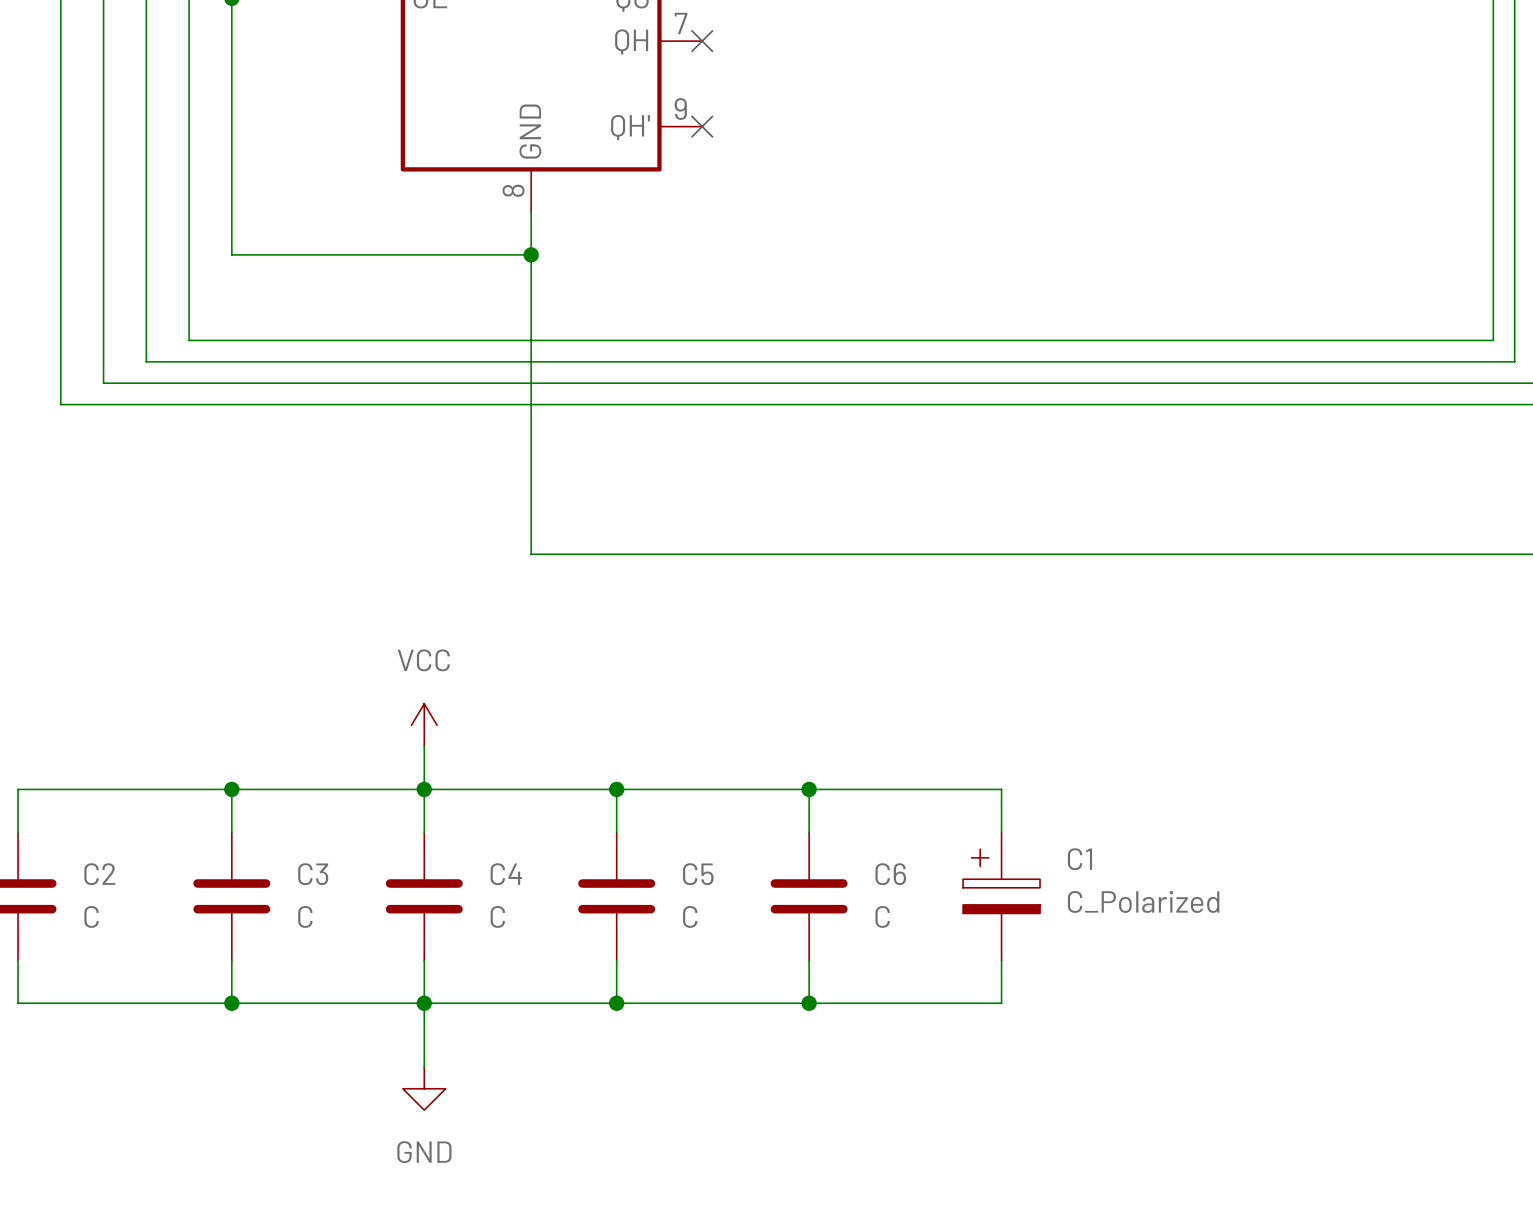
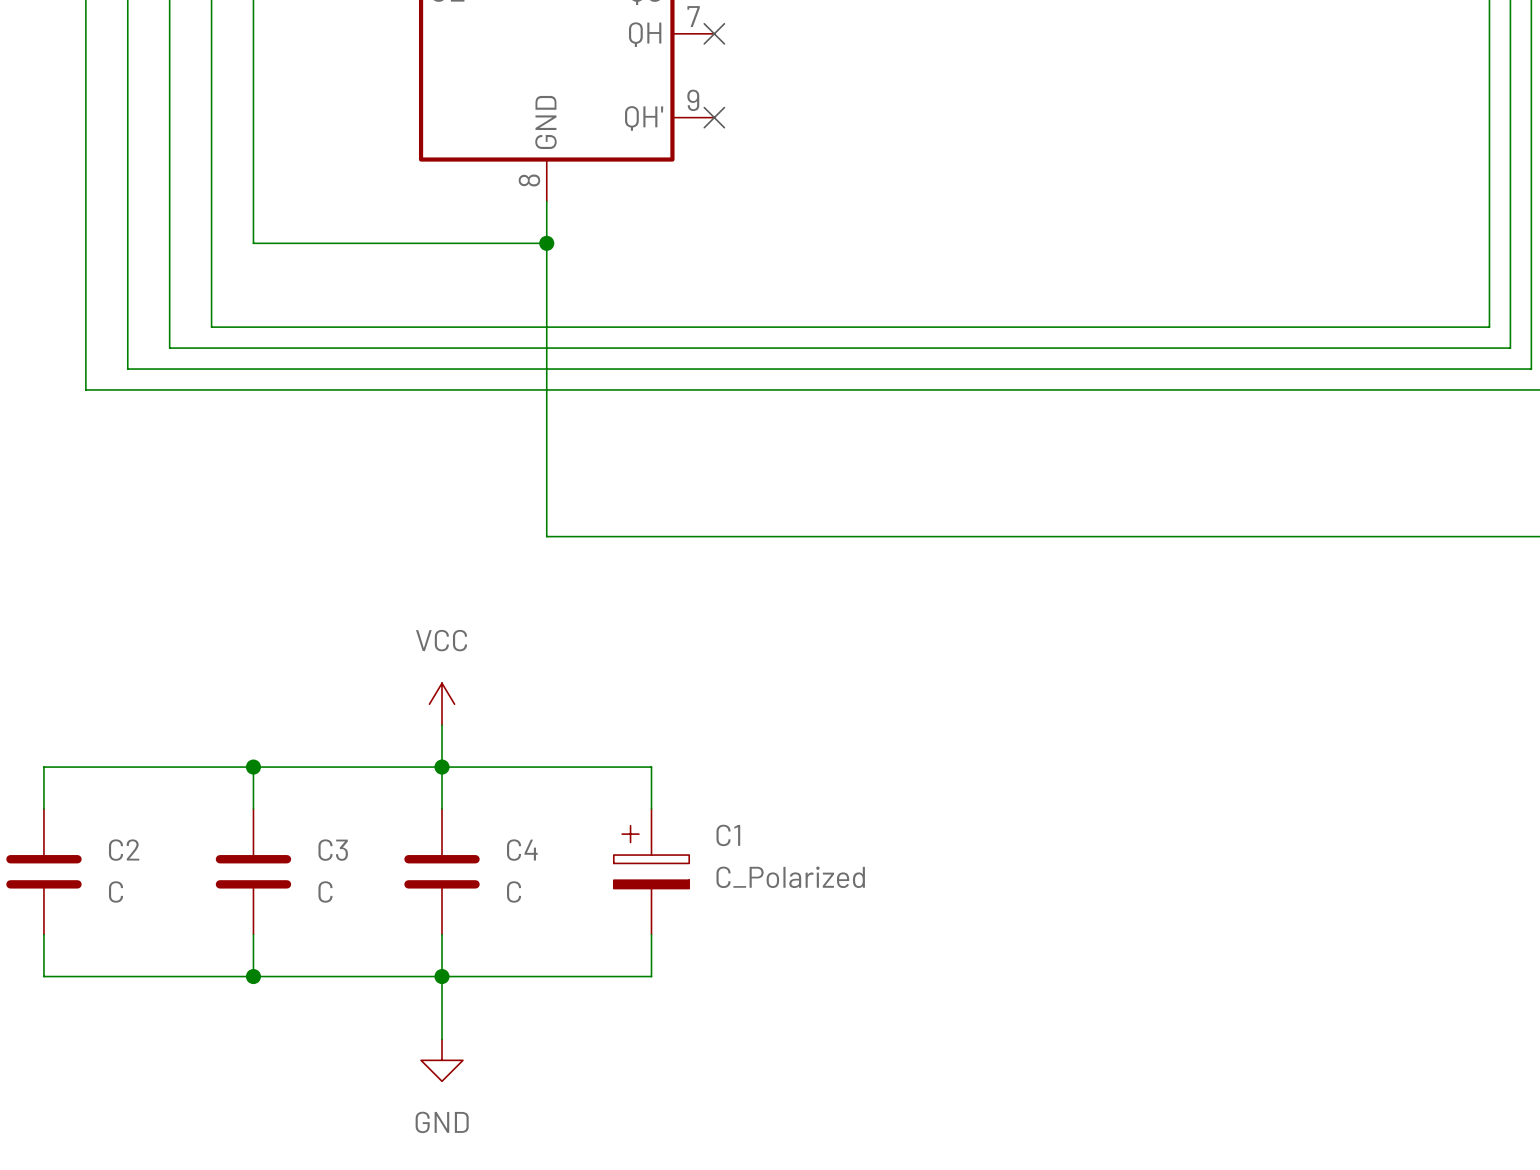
wire: (616, 789) (616, 832) -> none
junction: (616, 789) -> none
wire: (638, 789) (1001, 789) (1001, 832) -> (651, 767) (651, 808)
wire: (809, 789) (809, 832) -> none
junction: (809, 789) -> none
C5: C (616, 896) -> none
C6: C (809, 896) -> none
C1 position: (1001, 896) -> (651, 871)
wire: (616, 960) (616, 1003) -> none
wire: (809, 960) (809, 1003) -> none
wire: (1001, 960) (1001, 1003) (638, 1003) -> (651, 934) (651, 976)
junction: (616, 1003) -> none
junction: (809, 1003) -> none

